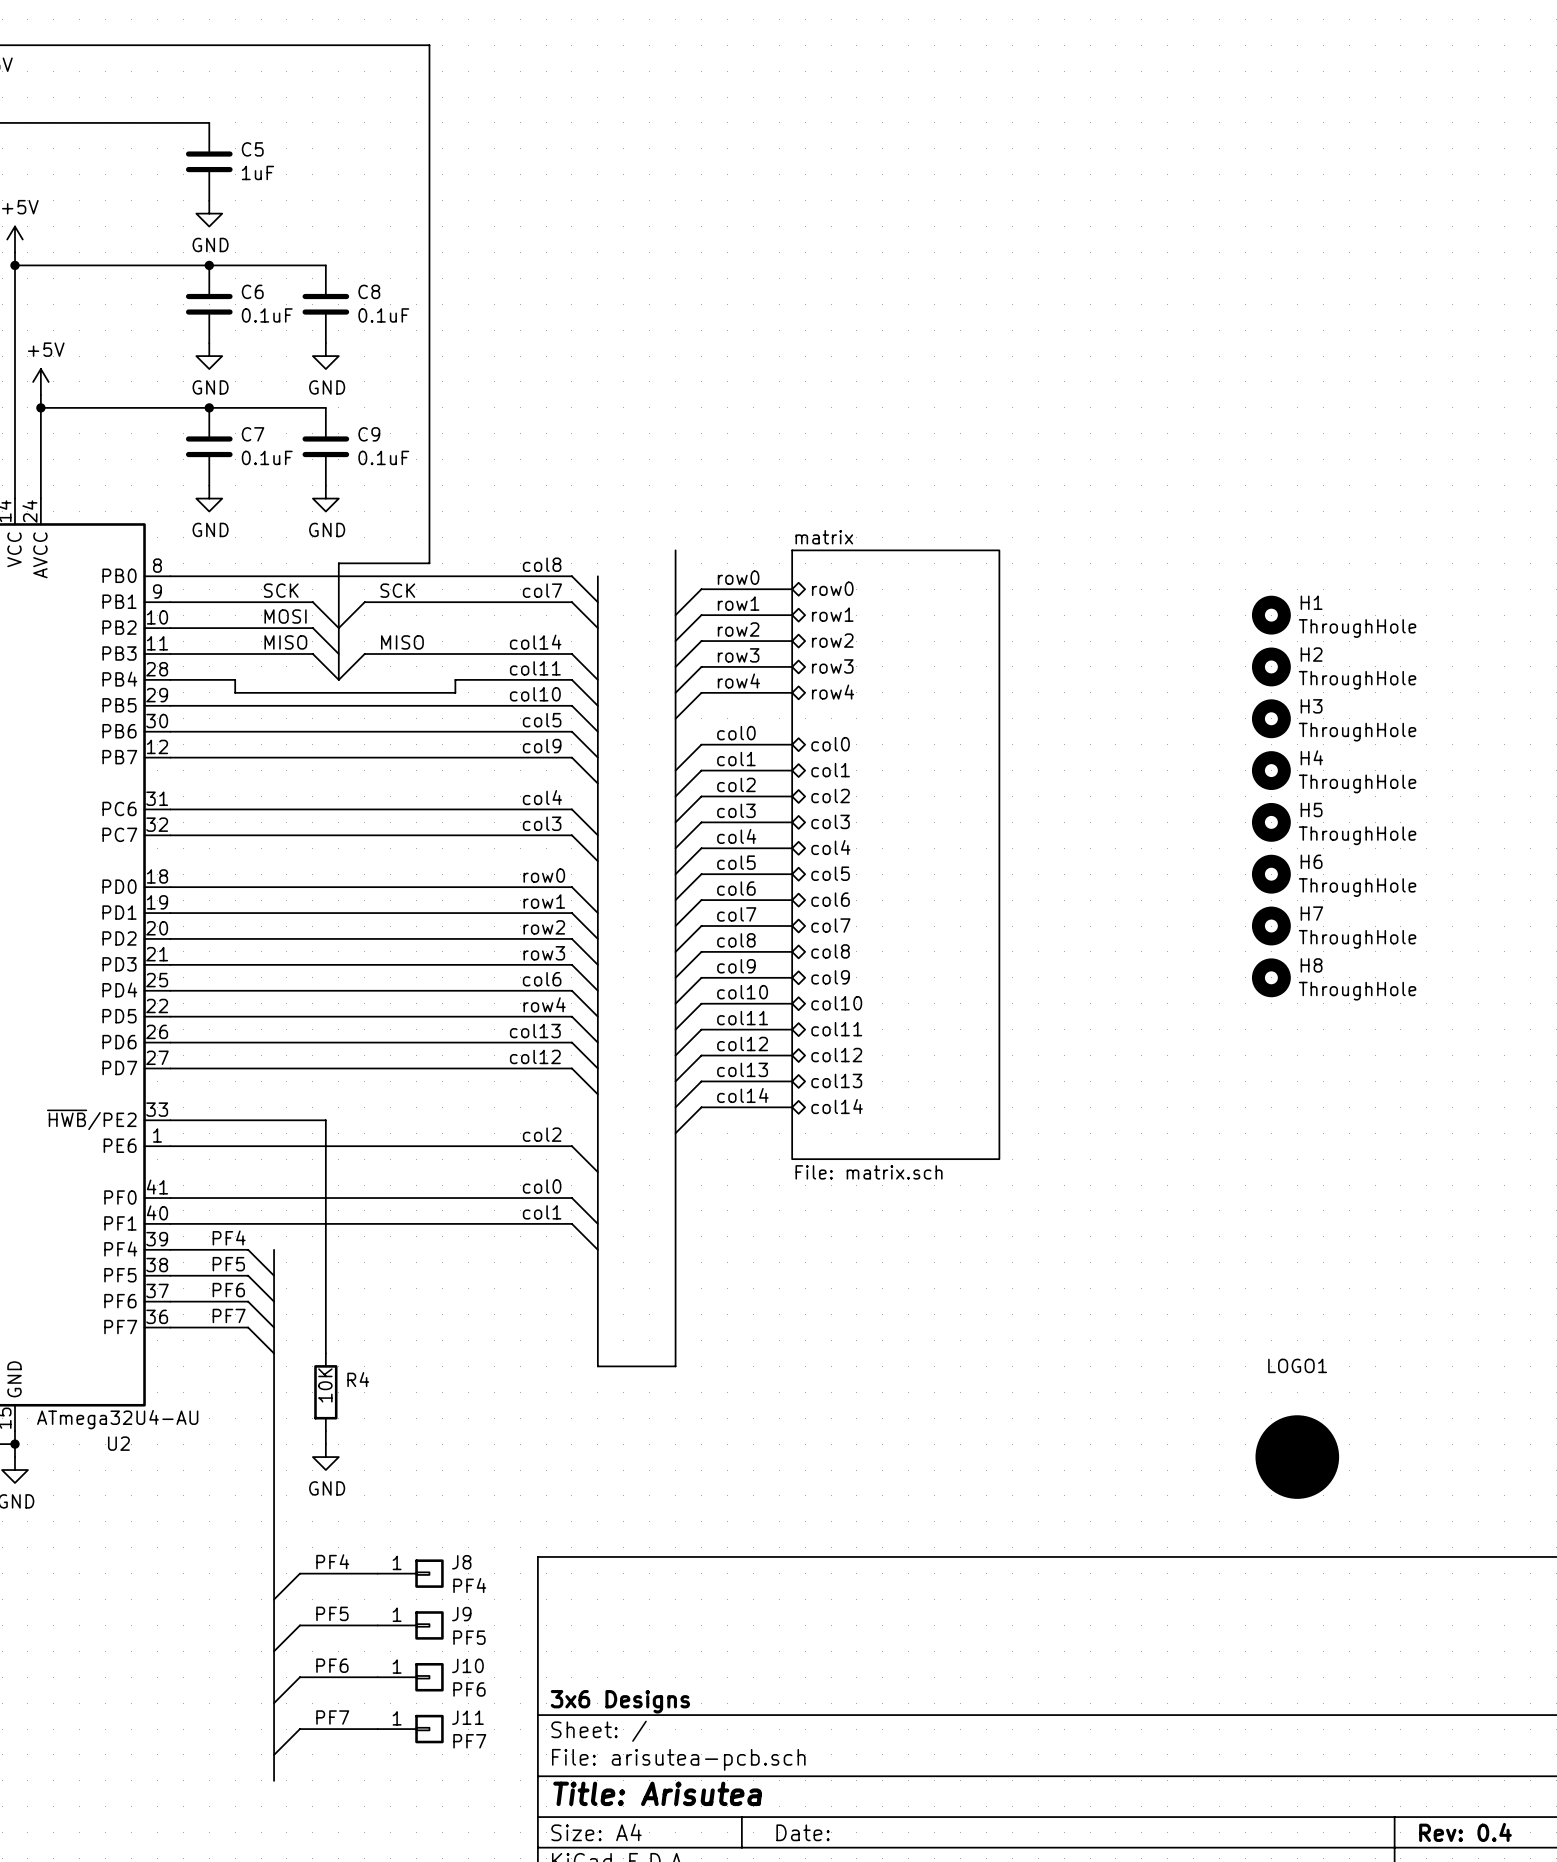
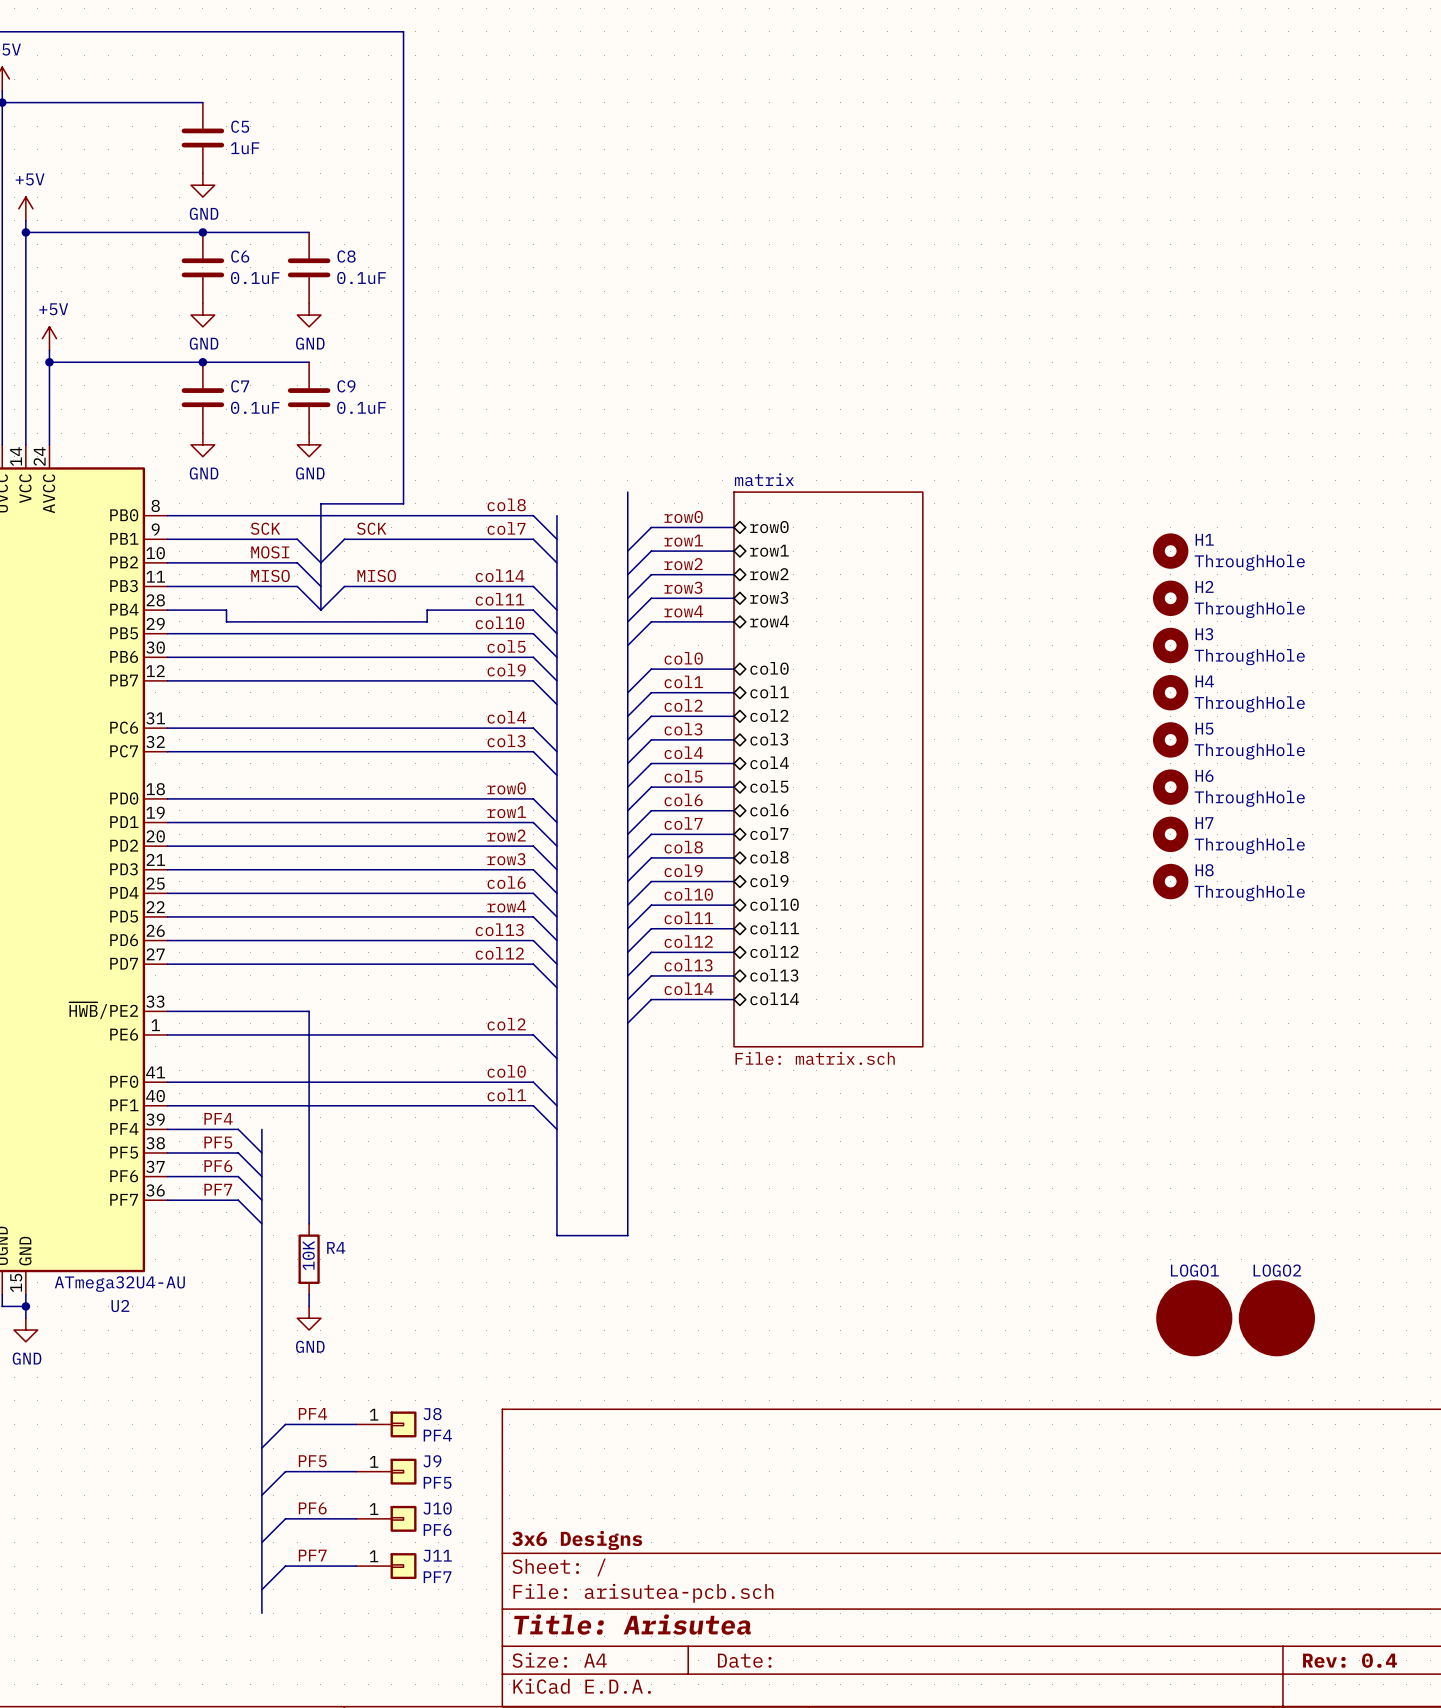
LOGO1 name position: LOGO1 (1297, 1365) -> LOGO1 (1194, 1270)
LOGO2: none -> (1276, 1318)

